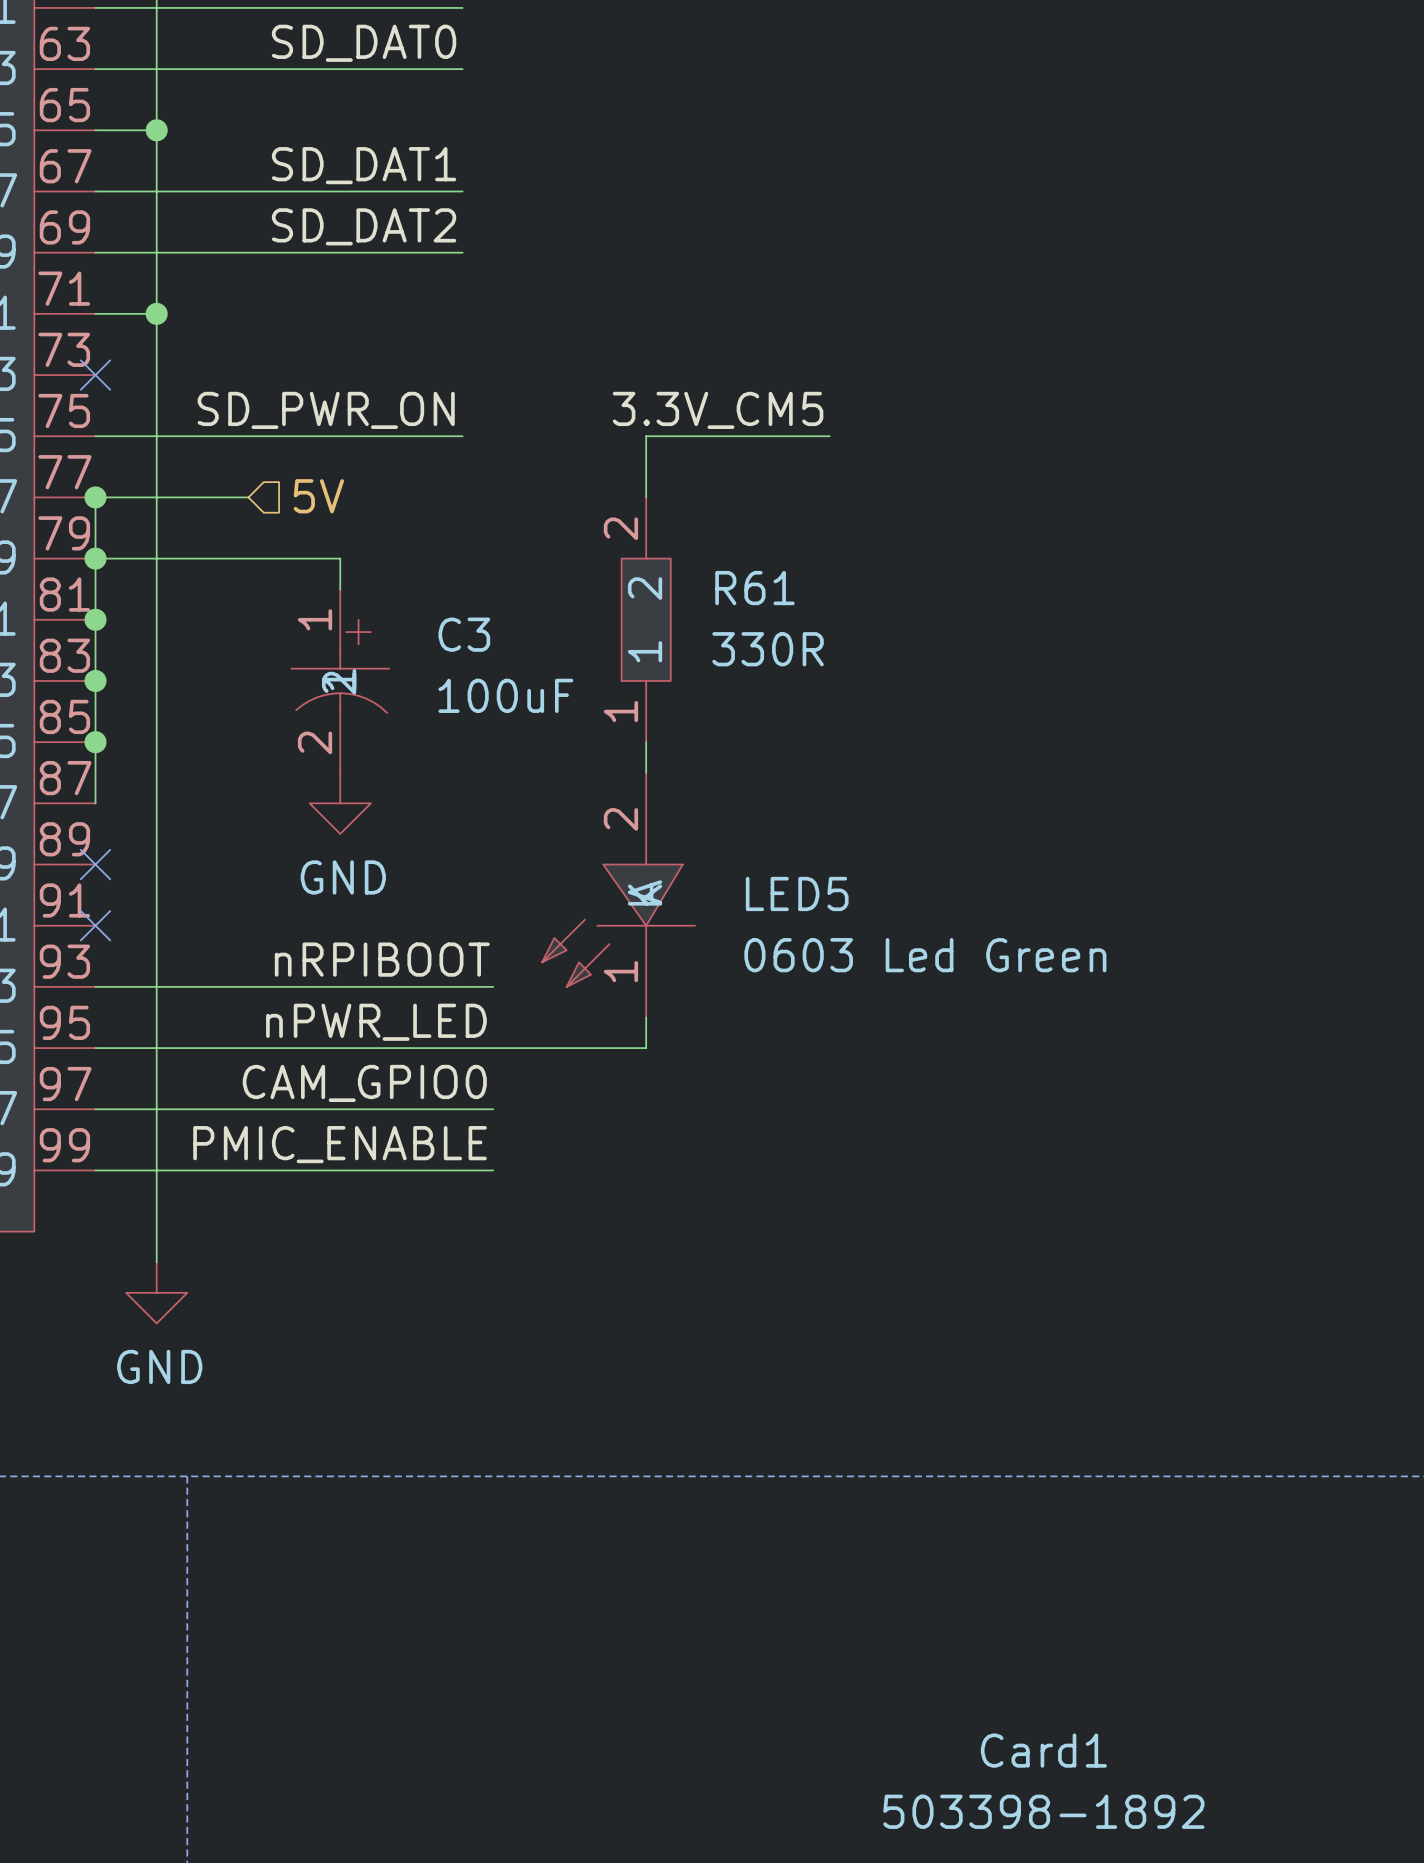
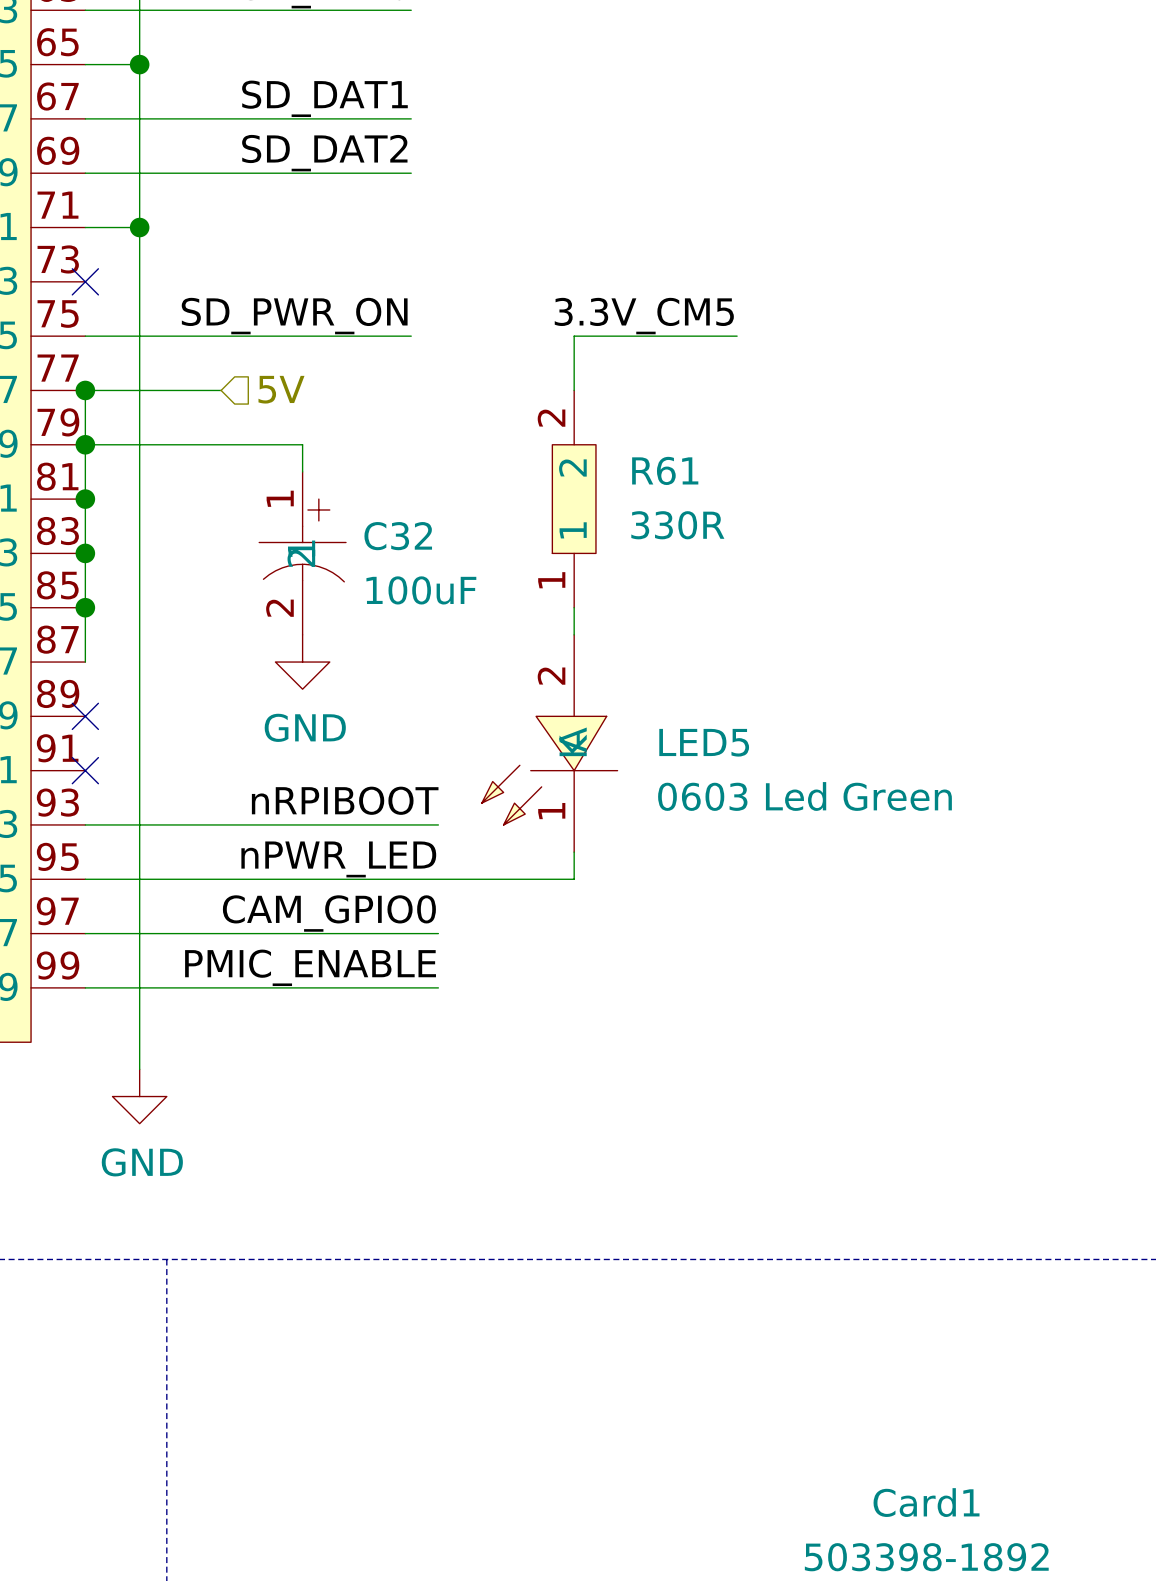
C3 name: C3 (464, 634) -> C32 (398, 536)
C3 value position: 100uF (505, 695) -> 100uF (421, 590)

